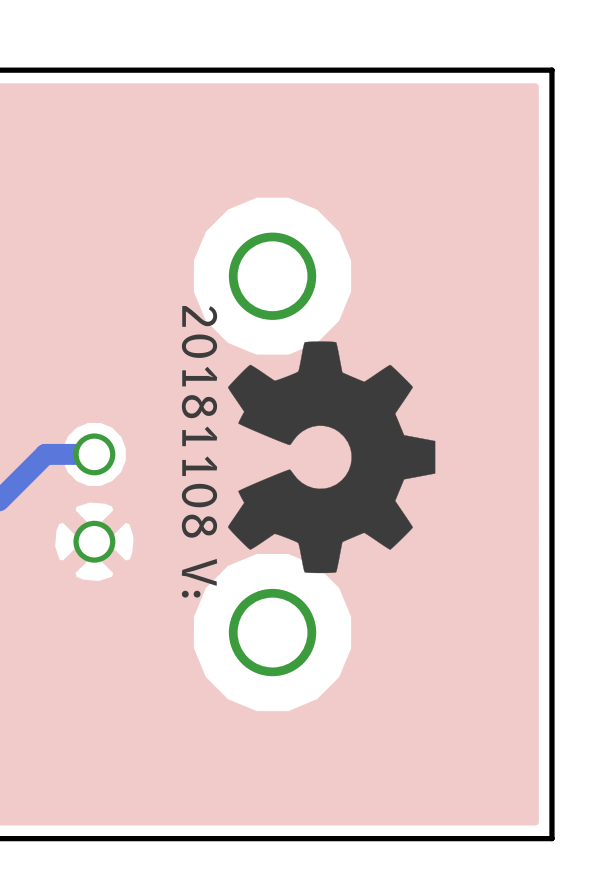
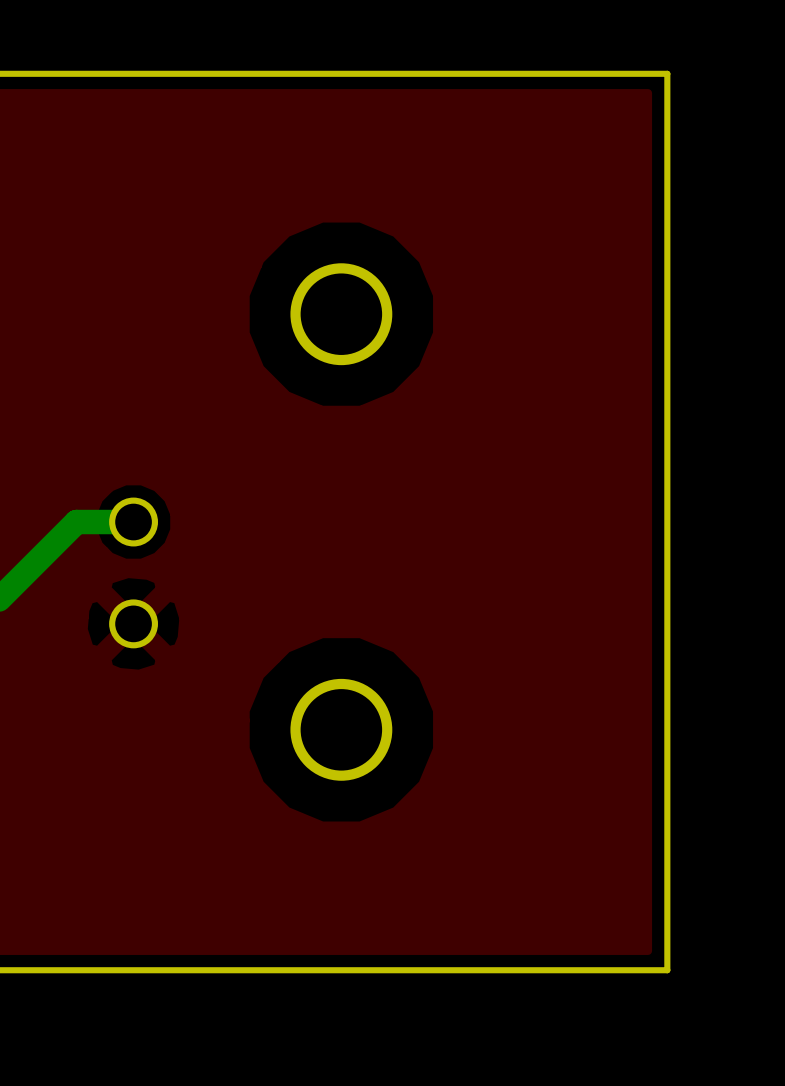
drawing: [227, 341, 436, 574] -> none

